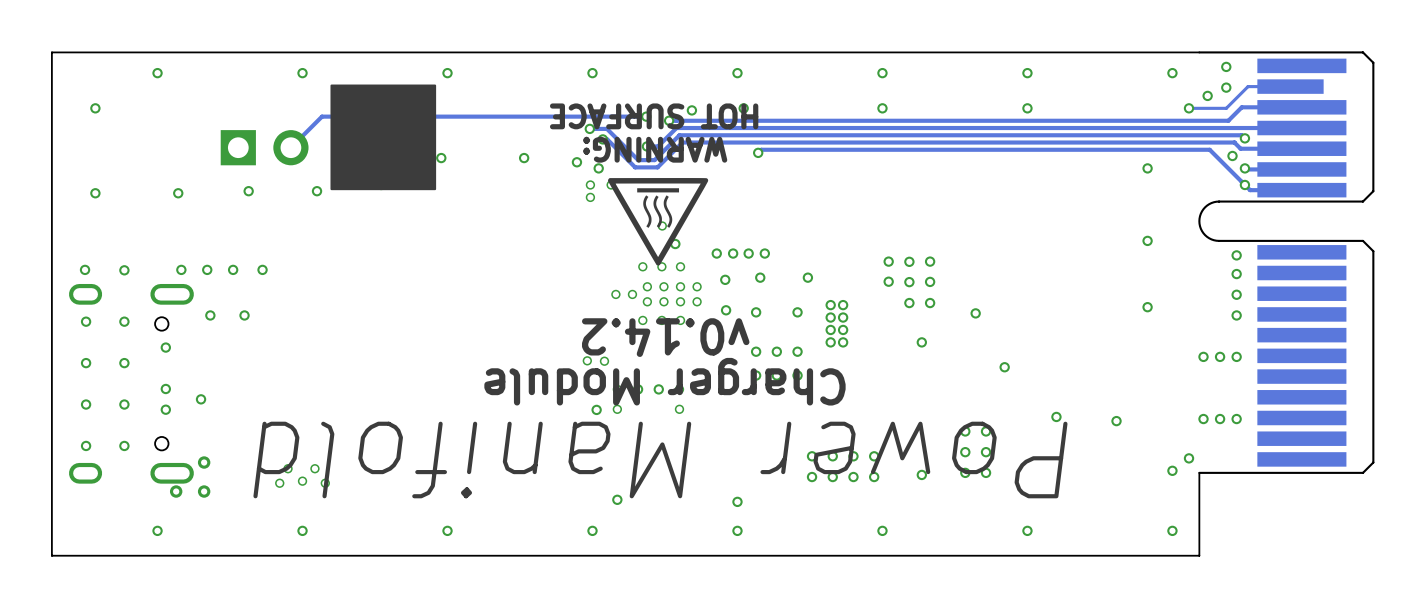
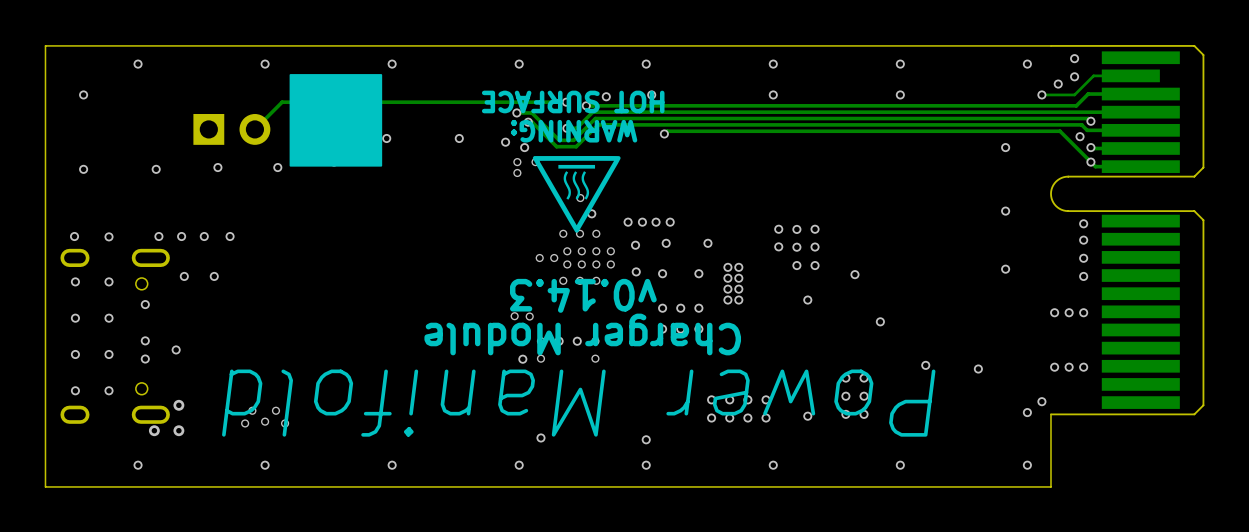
text: v0.14.2 (665, 337) -> v0.14.3 (583, 295)

